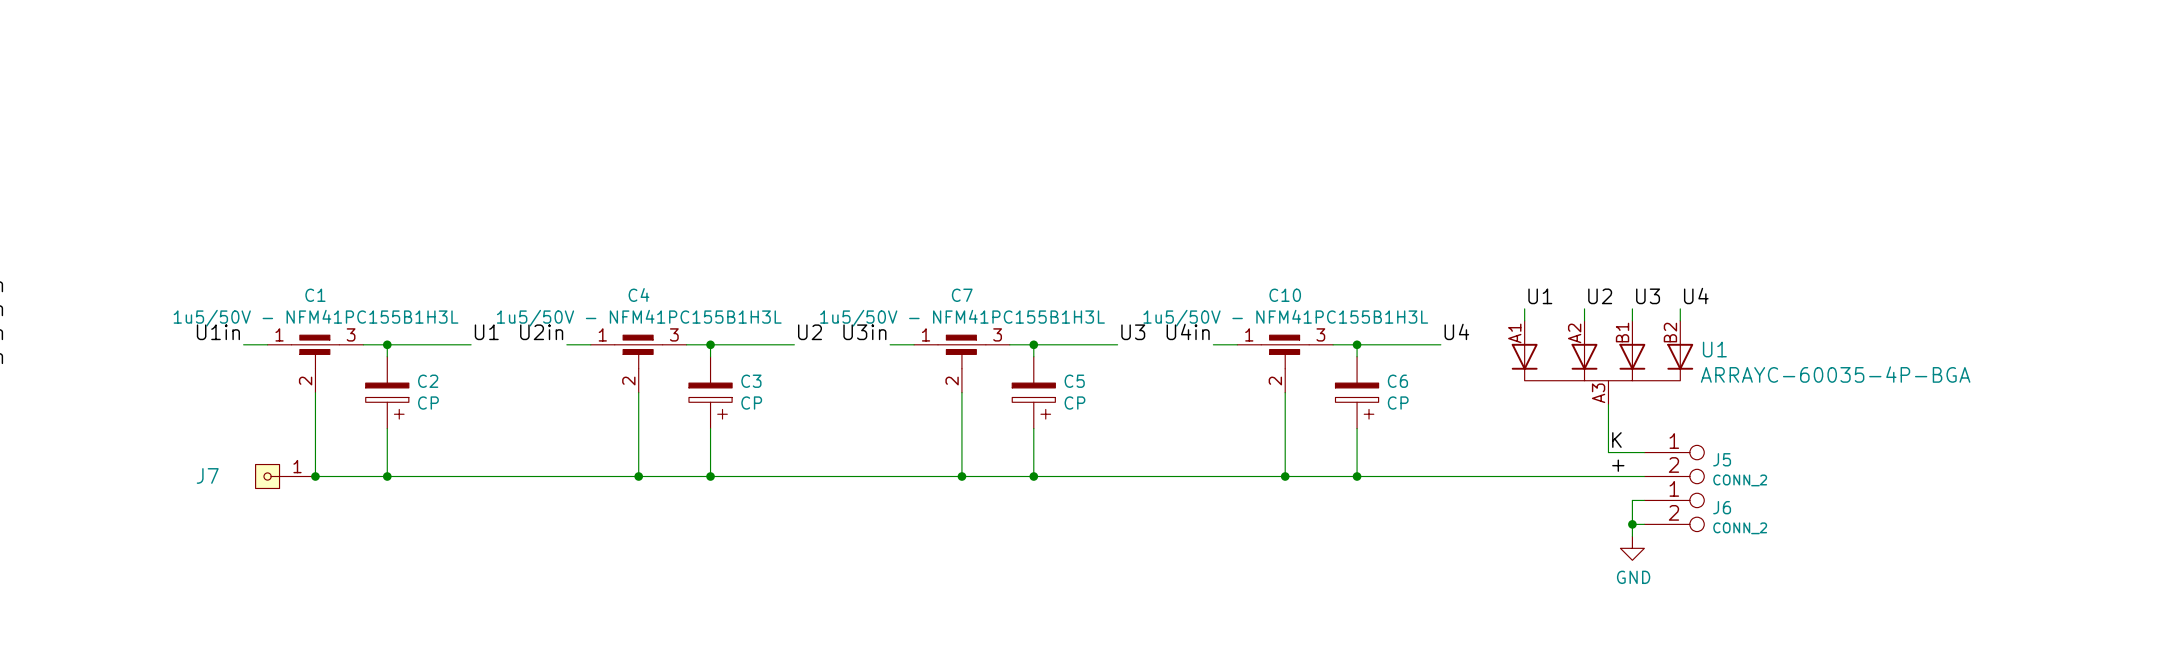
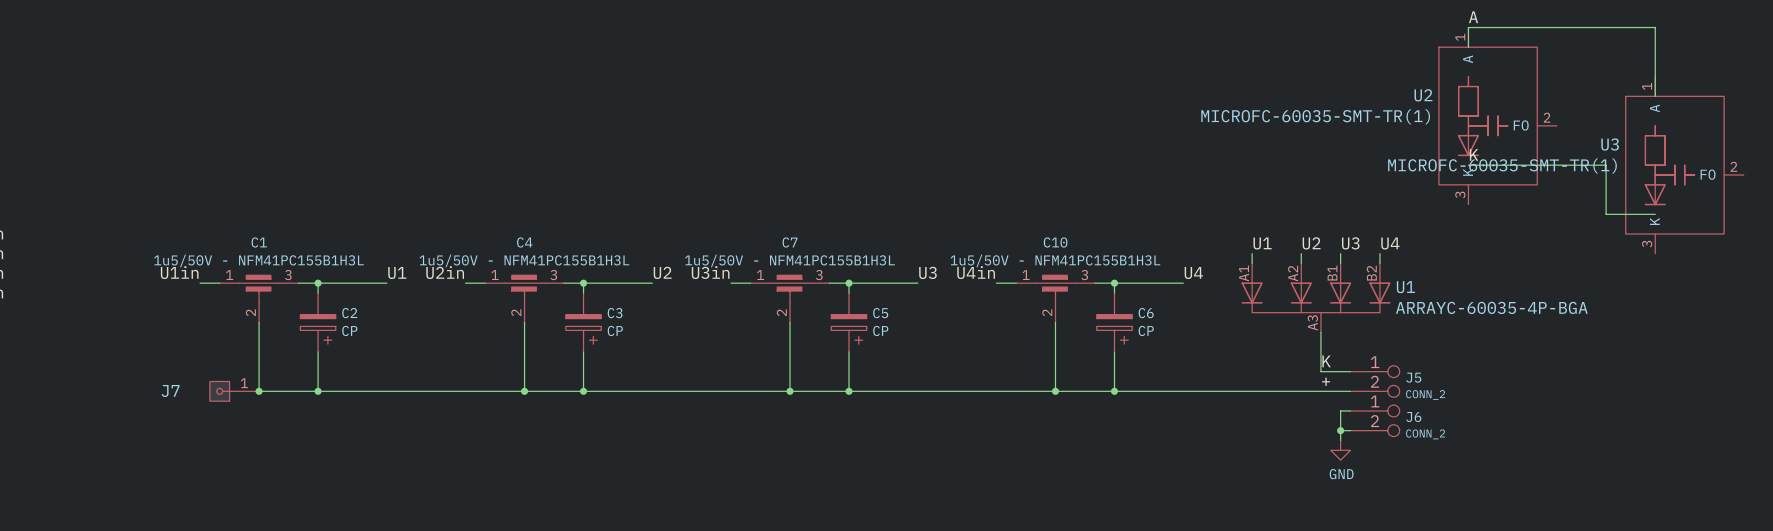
label: none -> A (1473, 17)
wire: none -> (1468, 47) (1468, 27) (1655, 27) (1655, 96)
U2: none -> MICROFC-60035-SMT-TR(1) (1497, 116)
label: none -> K (1474, 154)
wire: none -> (1468, 165) (1606, 165) (1606, 214) (1655, 214)
U3: none -> MICROFC-60035-SMT-TR(1) (1684, 165)

